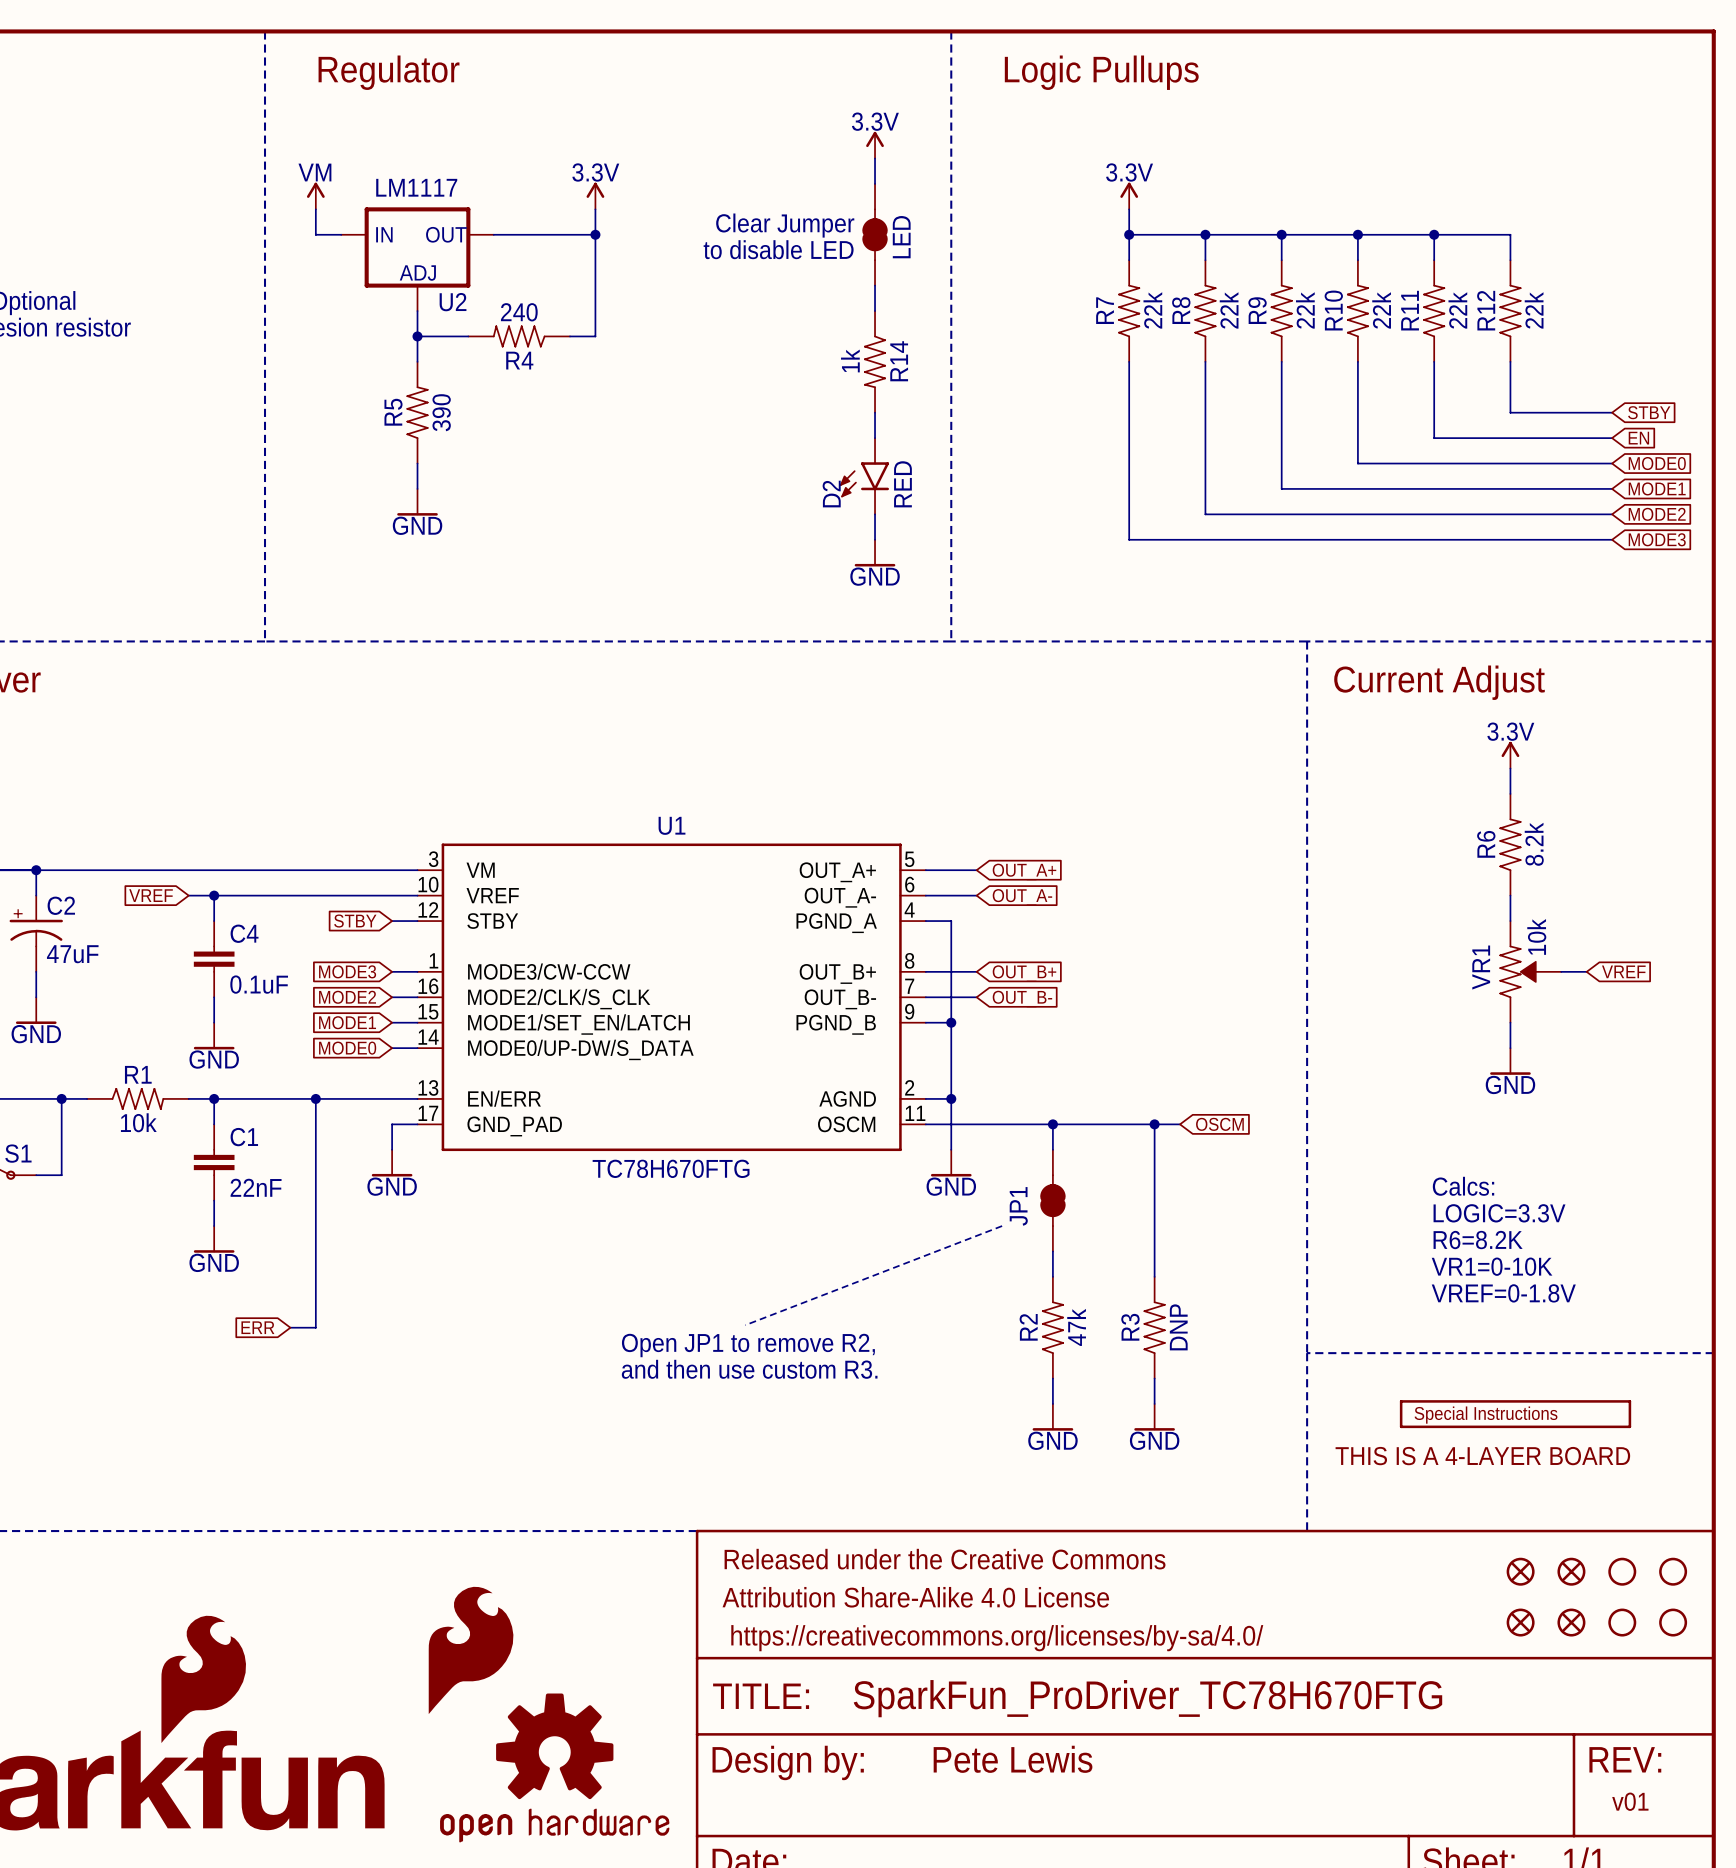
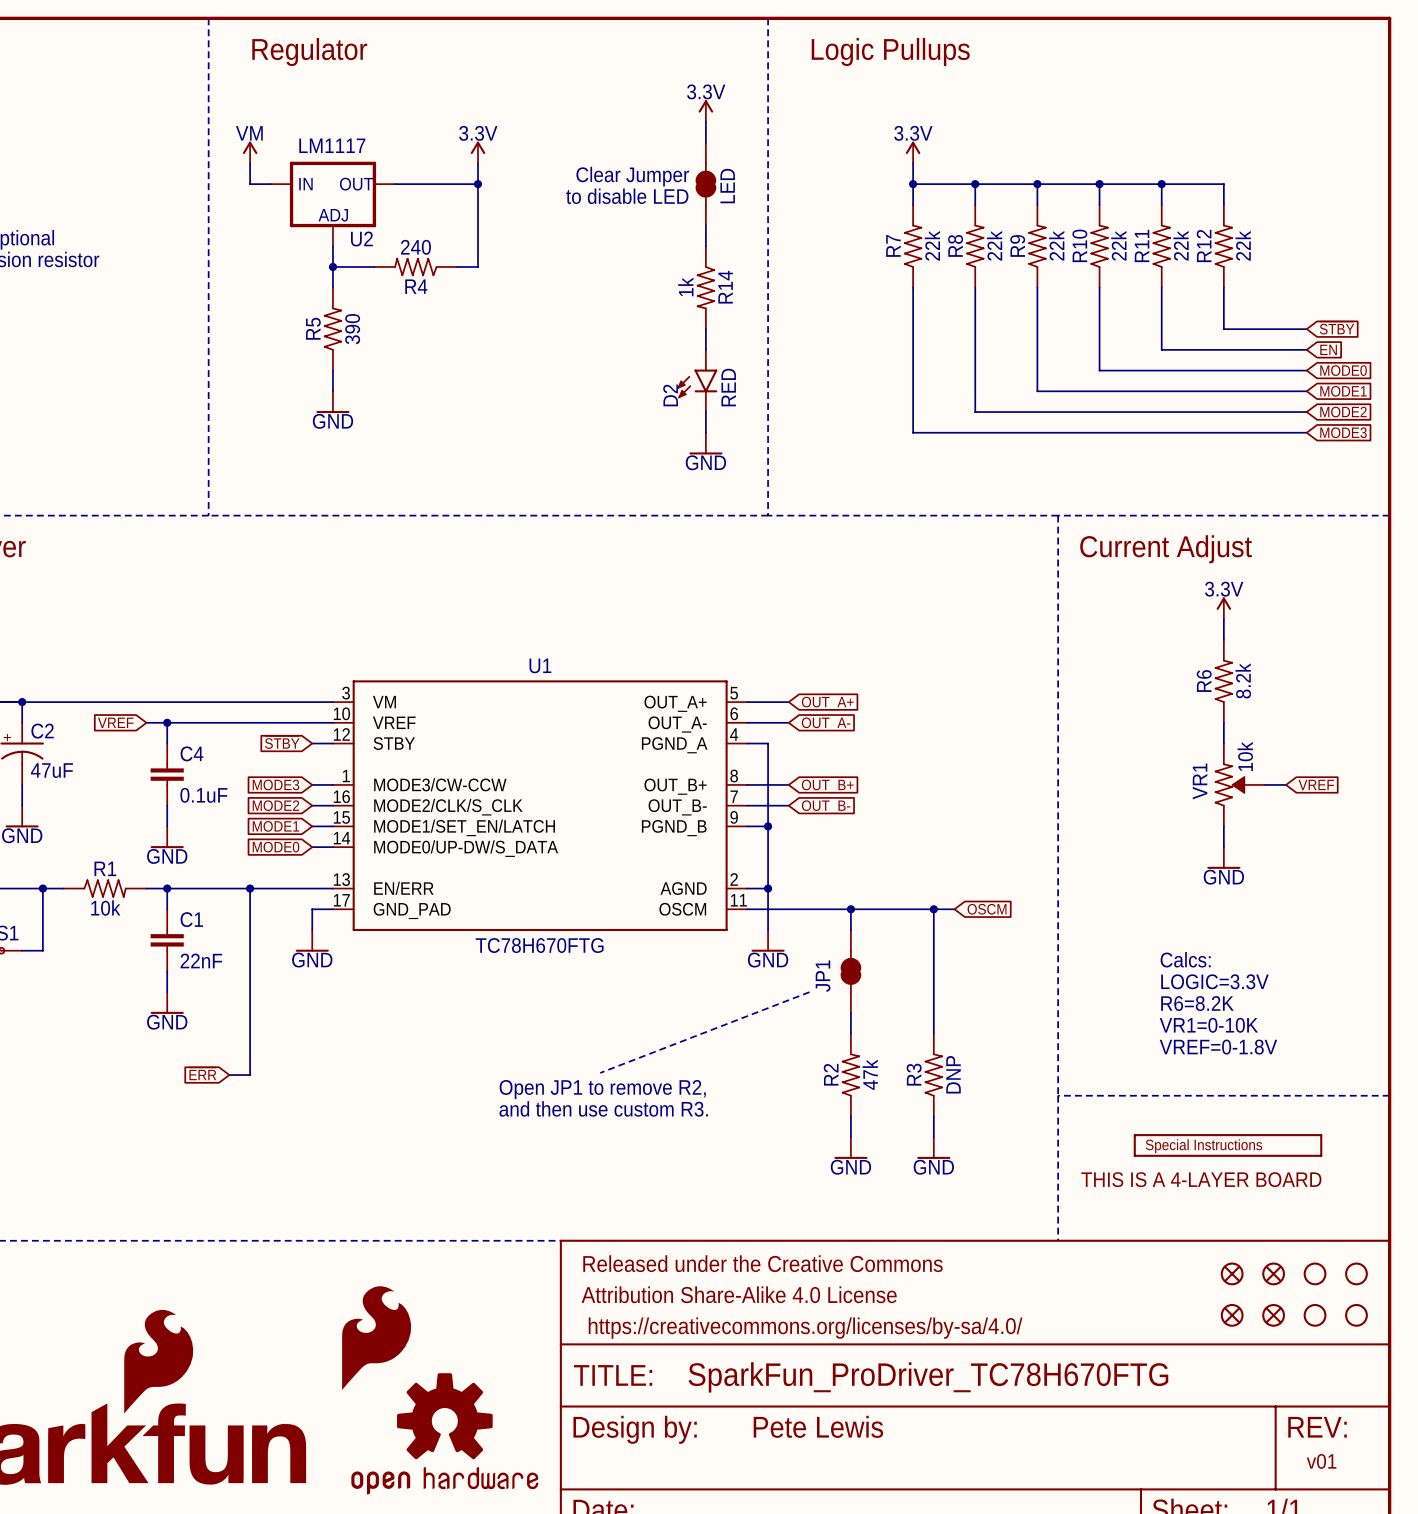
global label: STBY (1649, 412) -> ~{STBY} (1337, 328)
global label: STBY (355, 921) -> ~{STBY} (282, 742)
global label: ERR (257, 1327) -> ~{ERR} (202, 1073)

